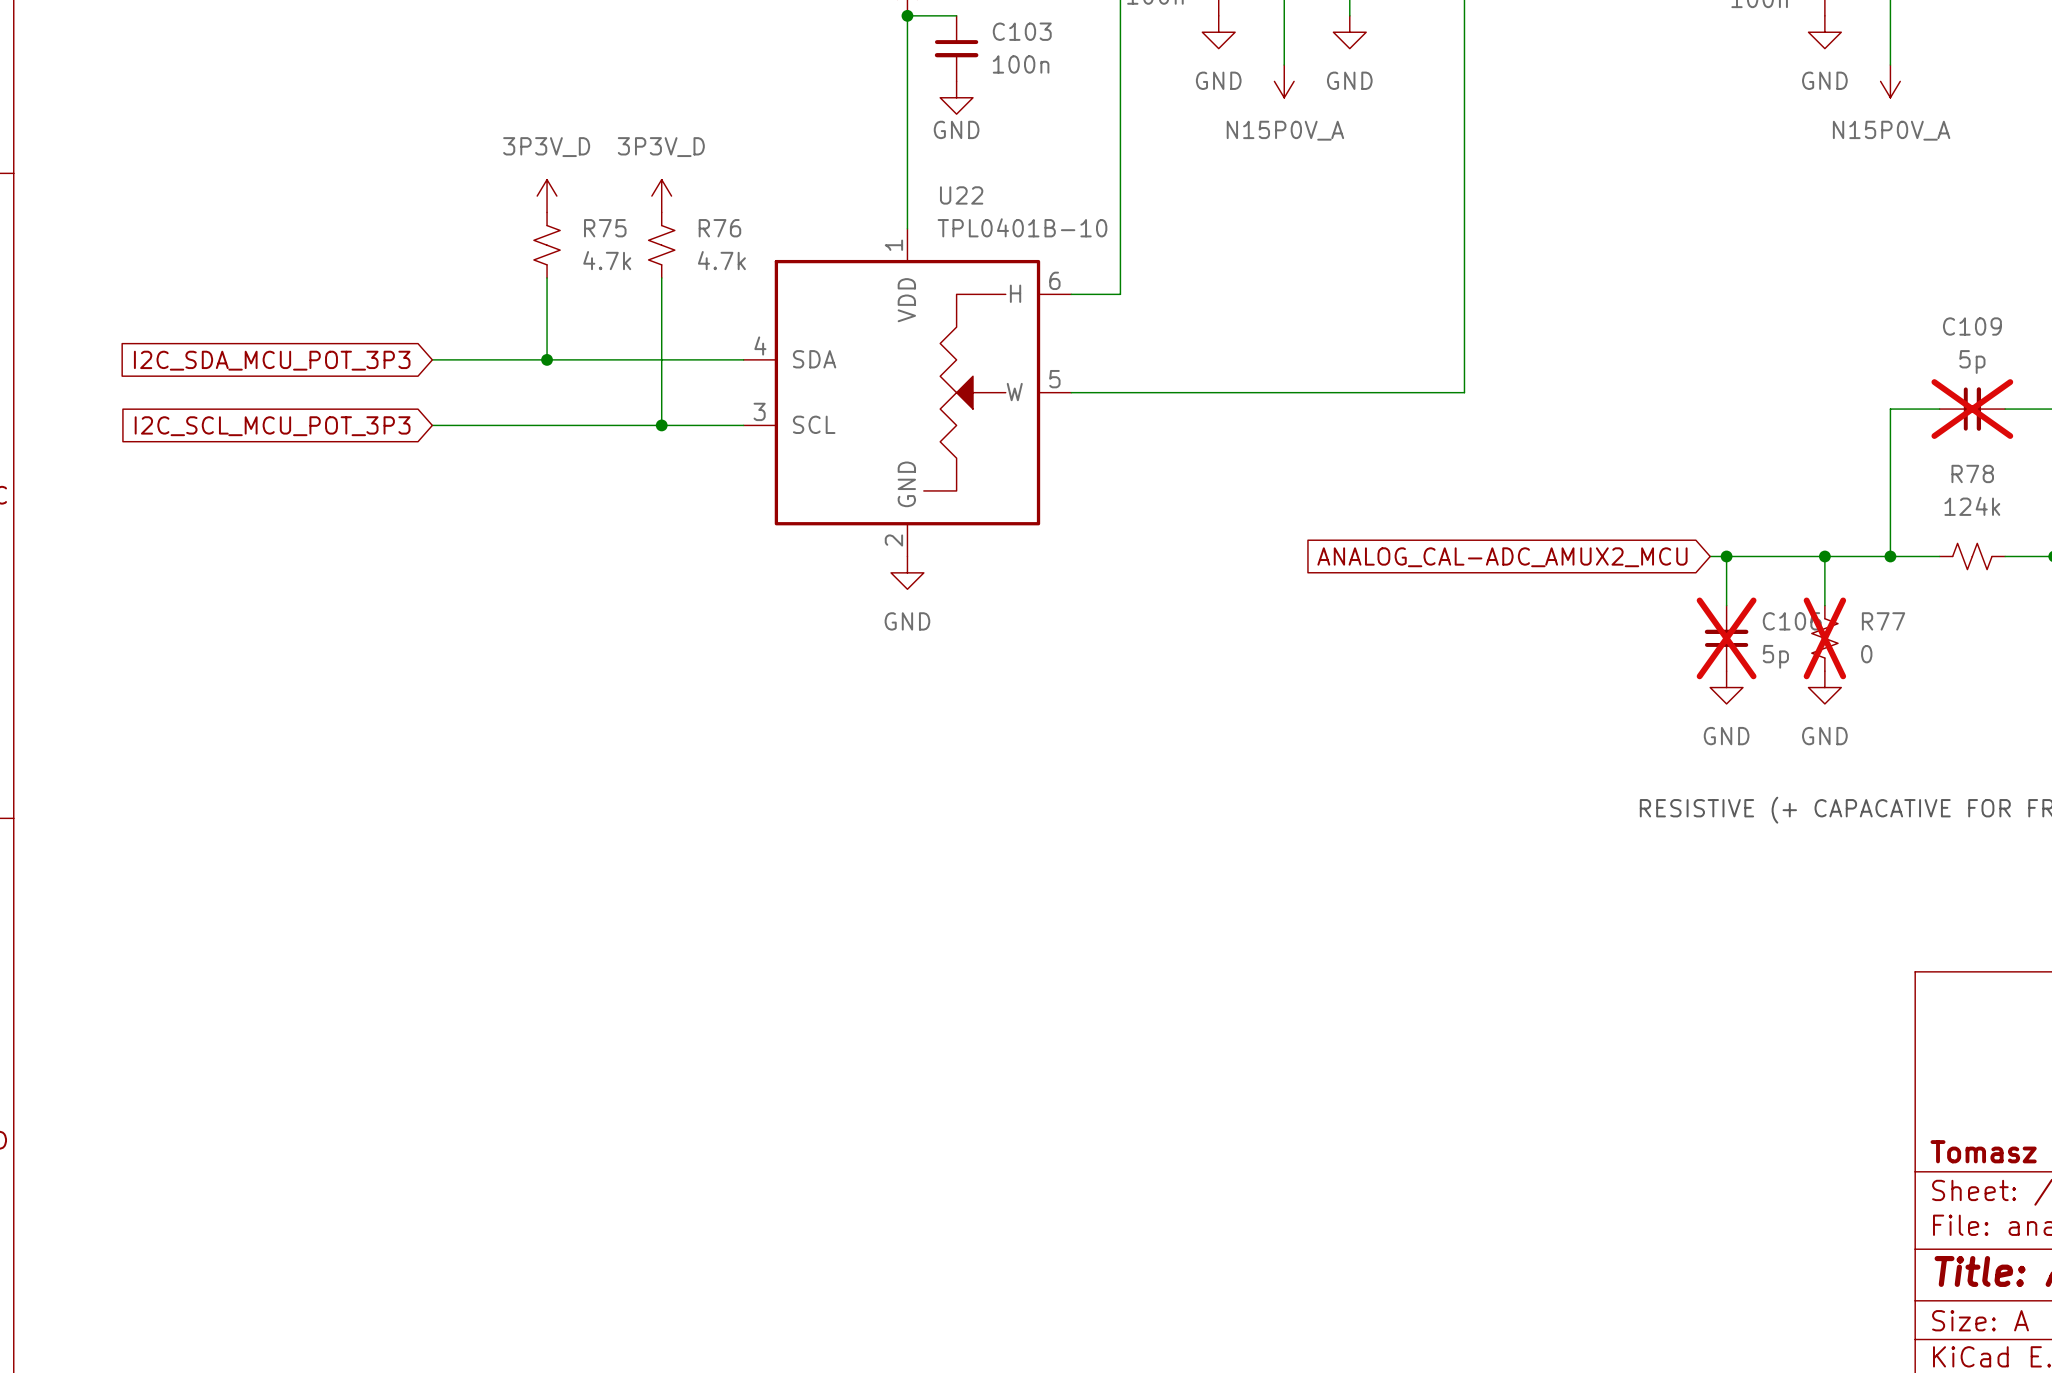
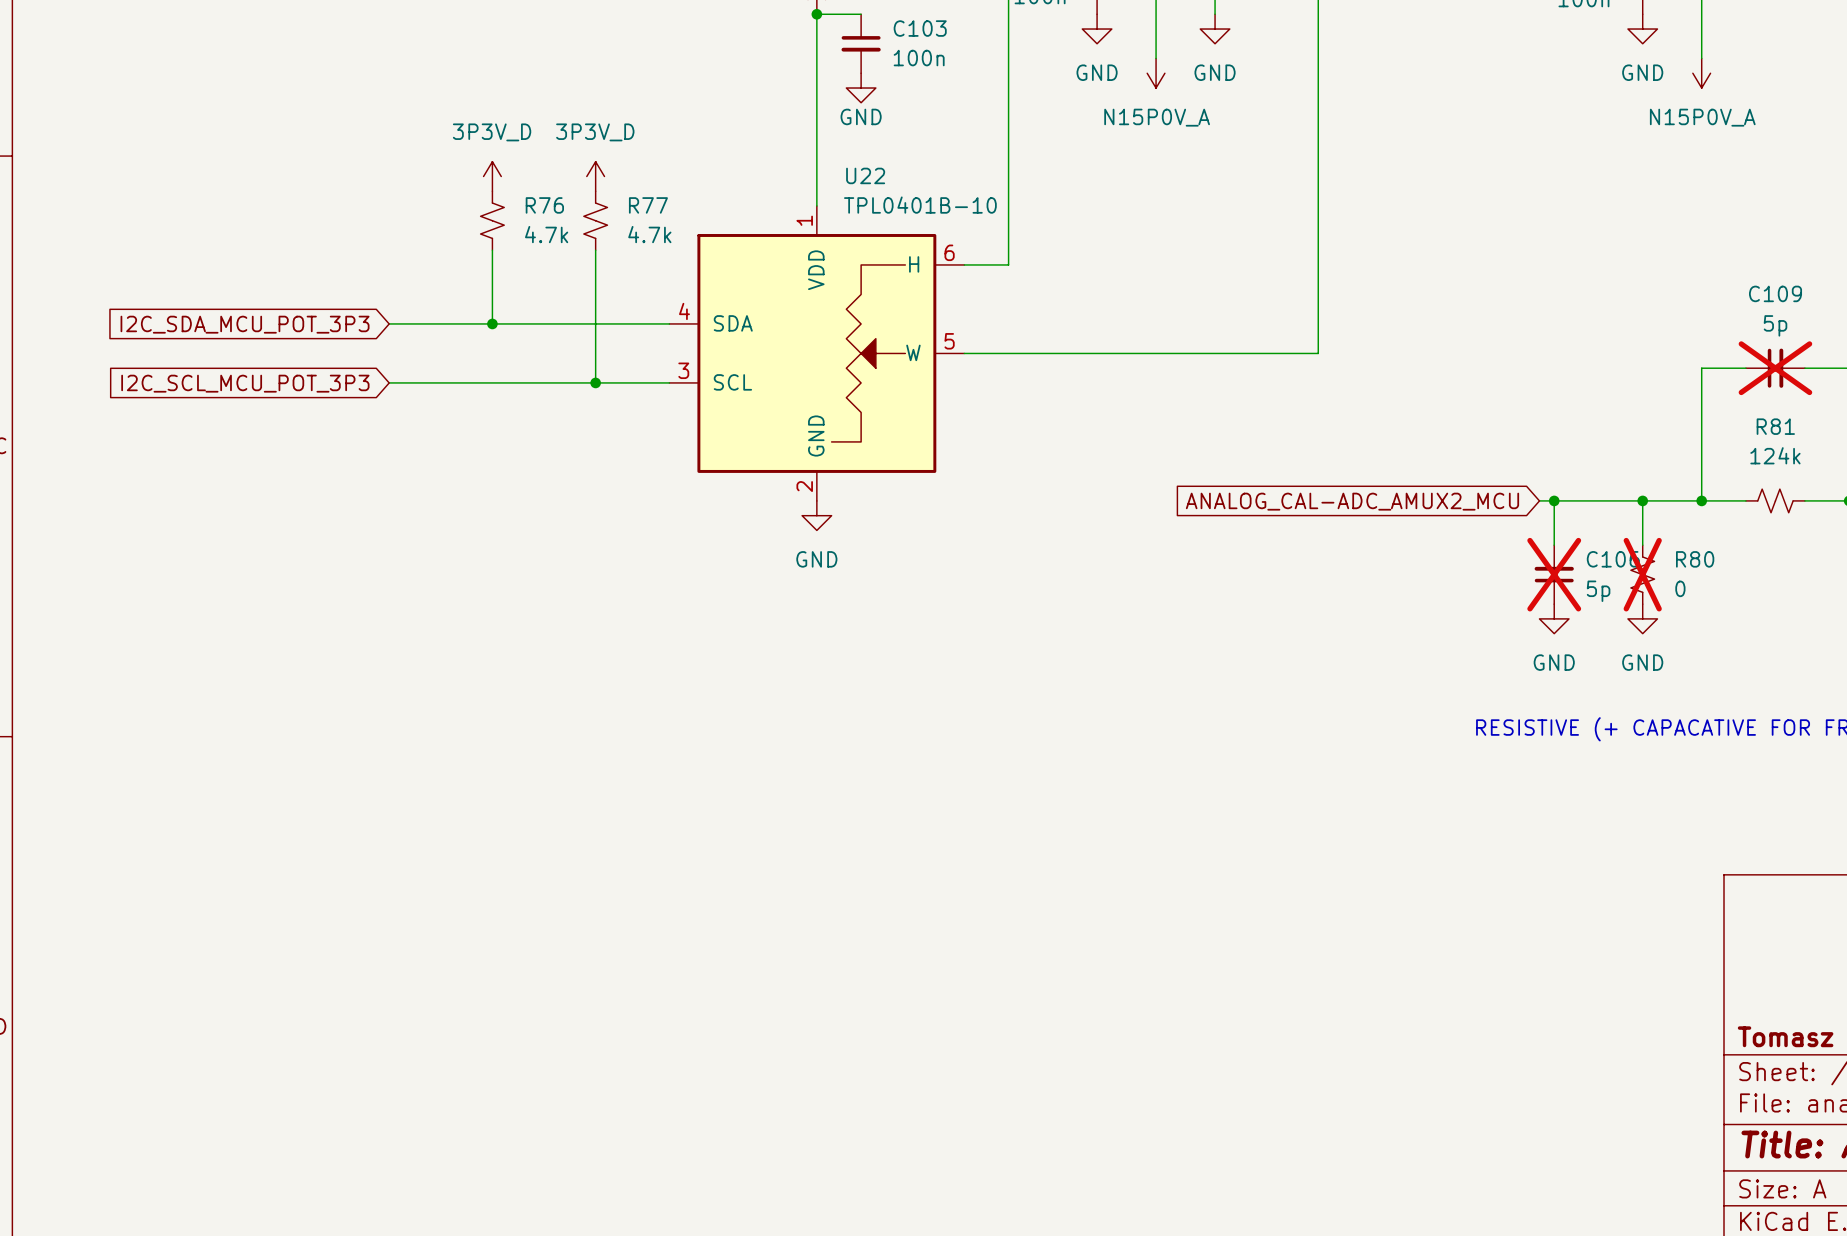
R75 name: R75 (605, 228) -> R76 (544, 205)
R76 name: R76 (719, 228) -> R77 (648, 205)
R78 name: R78 (1972, 473) -> R81 (1775, 426)
R77 name: R77 (1883, 621) -> R80 (1695, 559)

